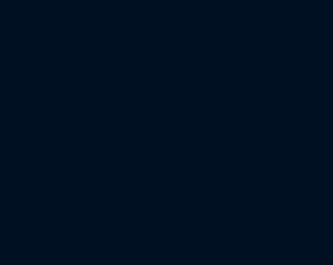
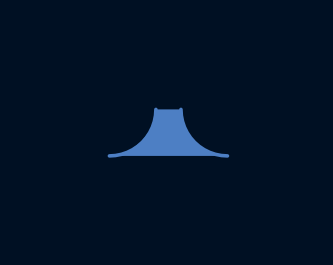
drawing: none -> [109, 109, 228, 156]
bottom track: none -> (155, 109) (152, 127) (142, 142) (127, 152) (109, 155)
bottom track: none -> (180, 109) (184, 127) (194, 142) (209, 152) (227, 155)

